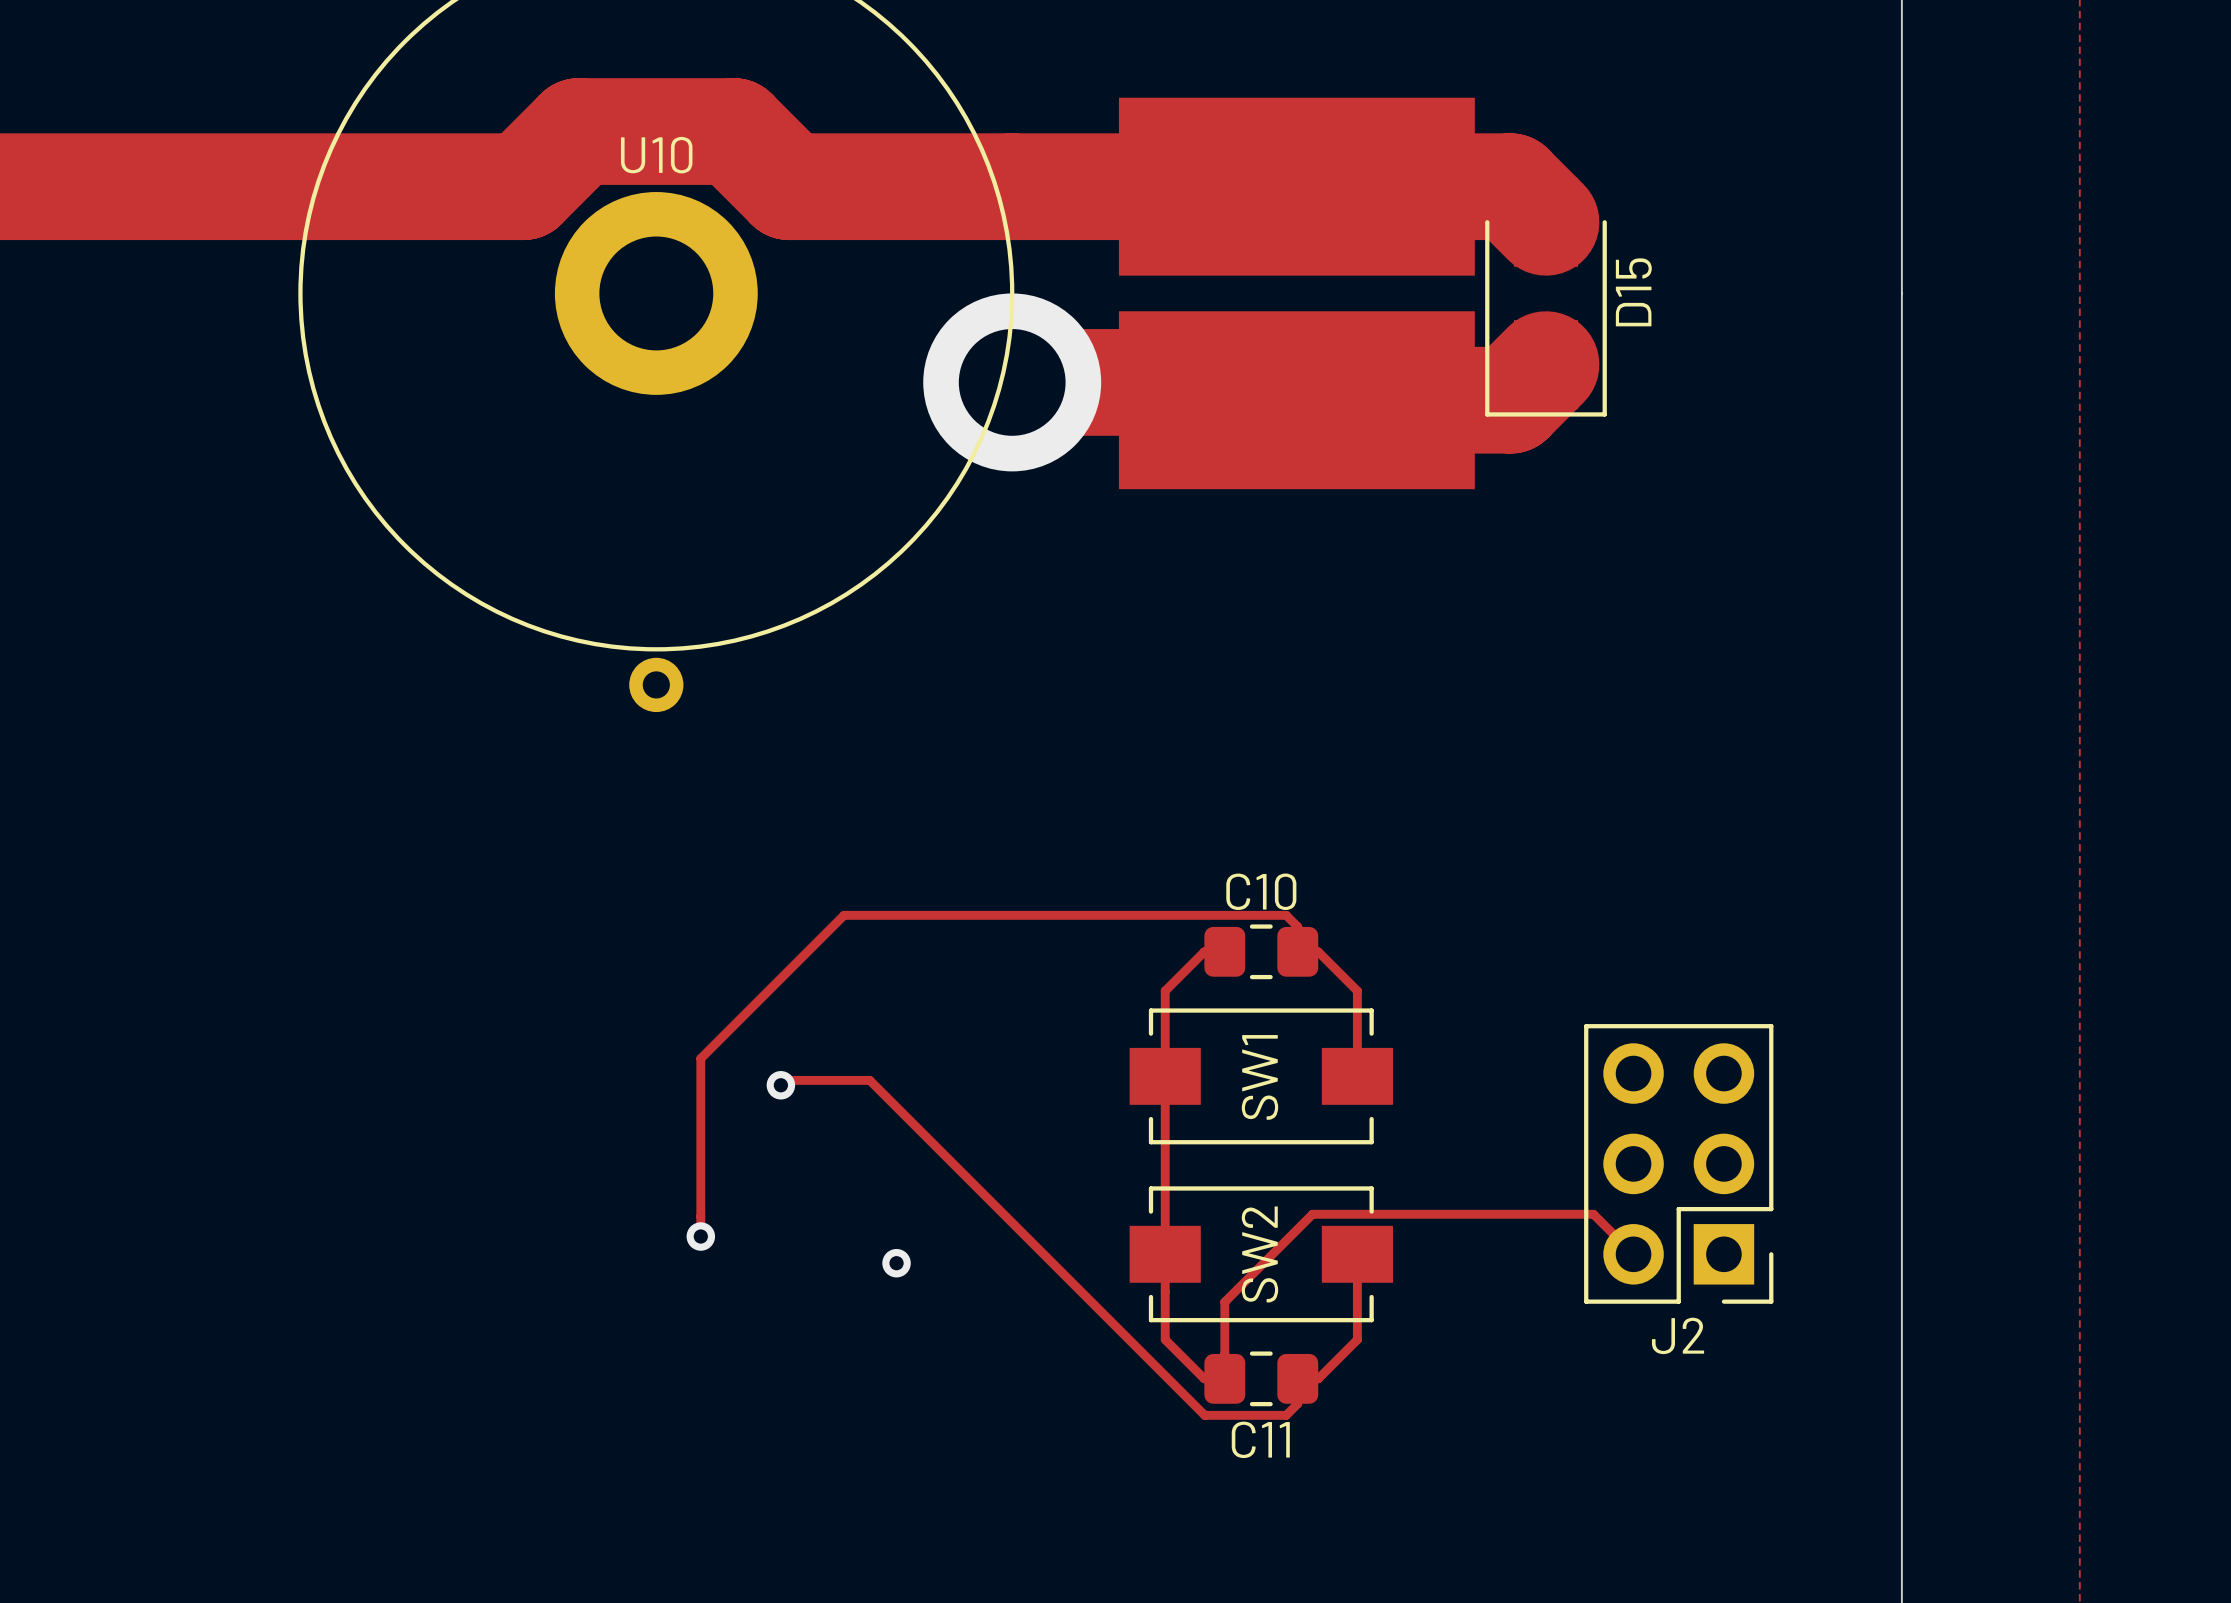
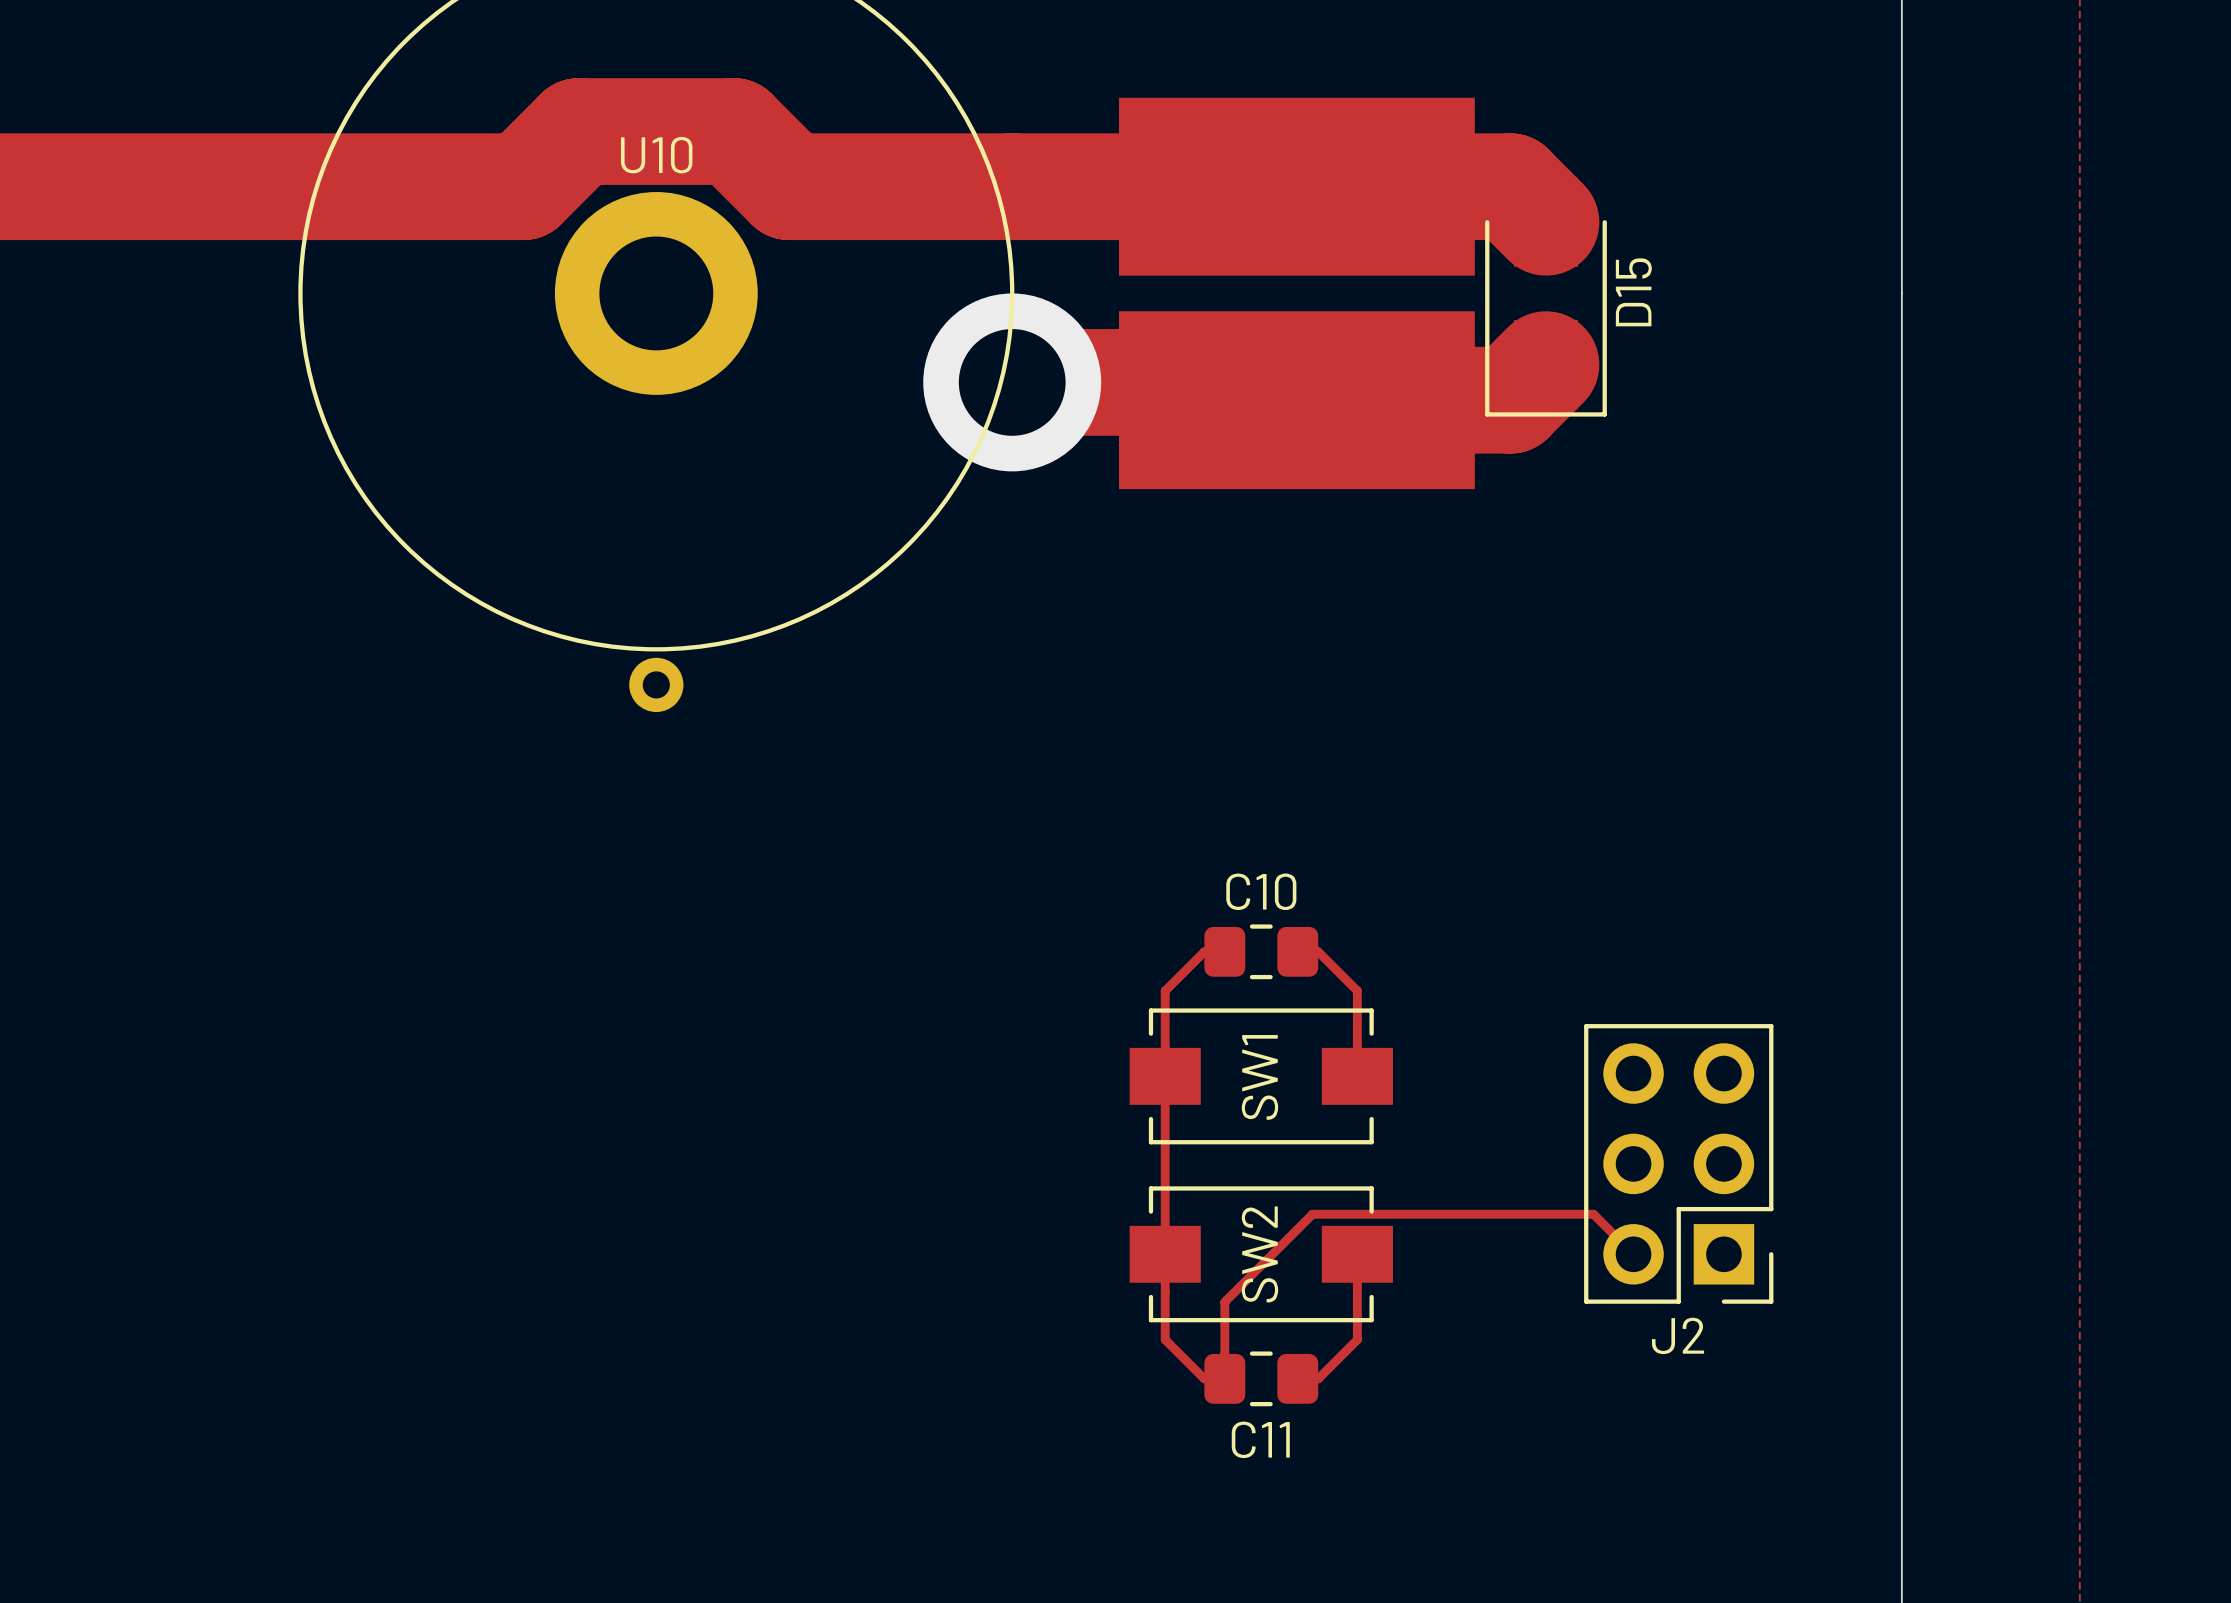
track: (1297, 951) (1297, 926) (1286, 915) (844, 915) (700, 1058) (700, 1236) -> none
track: (780, 1085) (785, 1080) (869, 1080) (1204, 1415) (1286, 1415) (1297, 1403) (1297, 1378) -> none
via: (780, 1085) -> none
via: (700, 1236) -> none
via: (896, 1263) -> none

